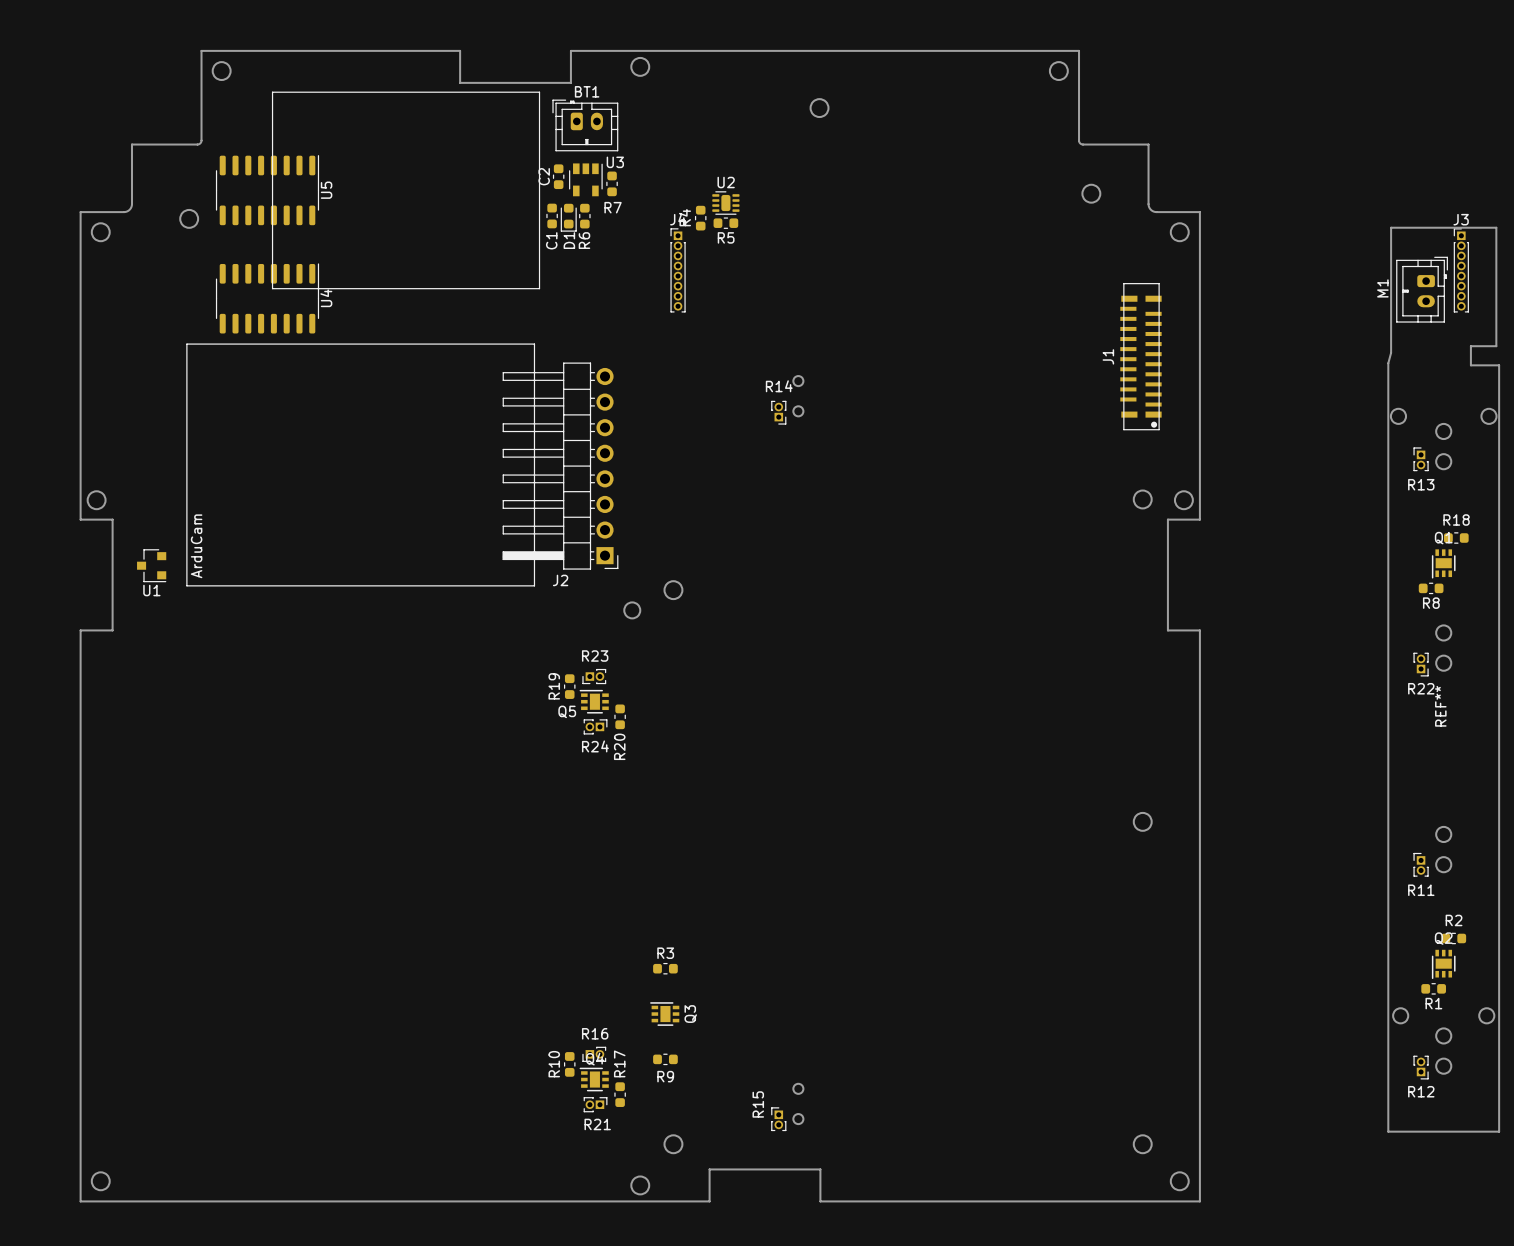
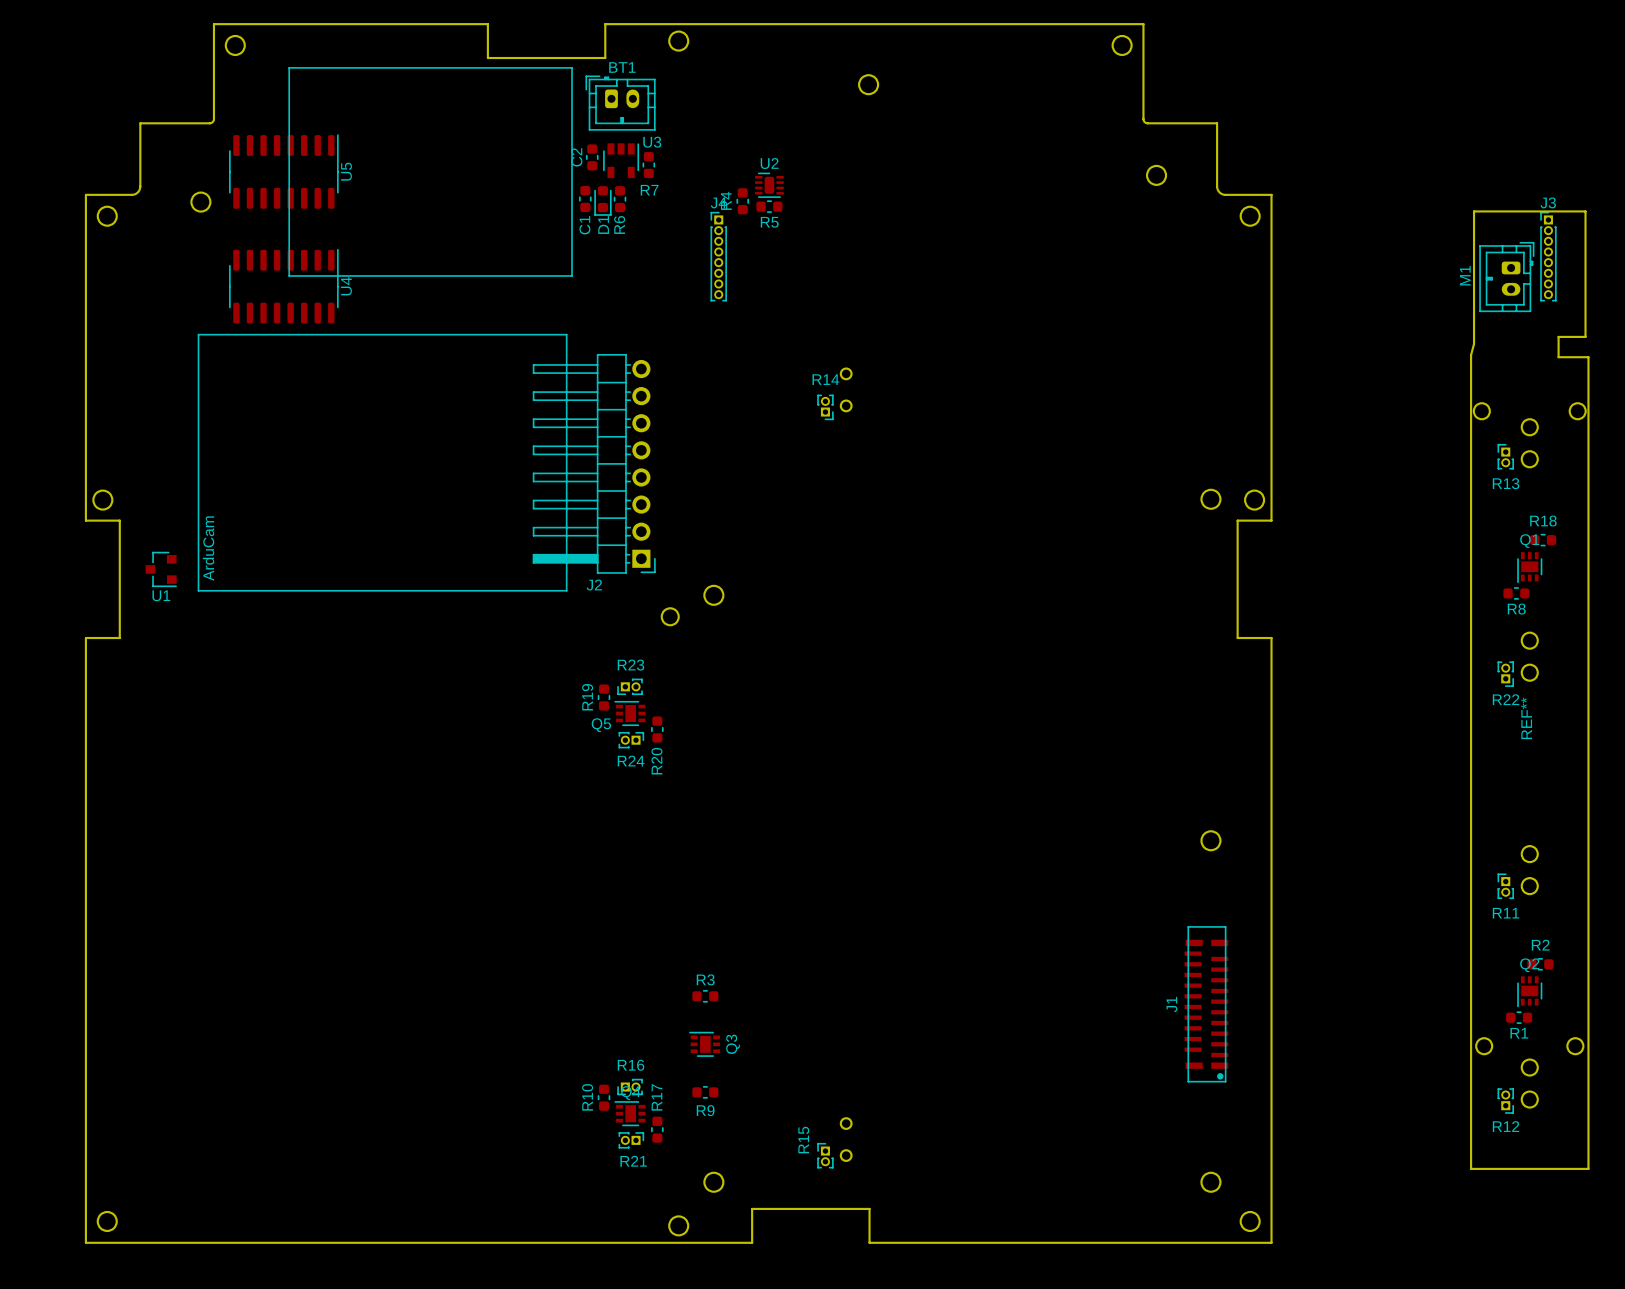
J1 position: (1140, 356) -> (1206, 1004)

